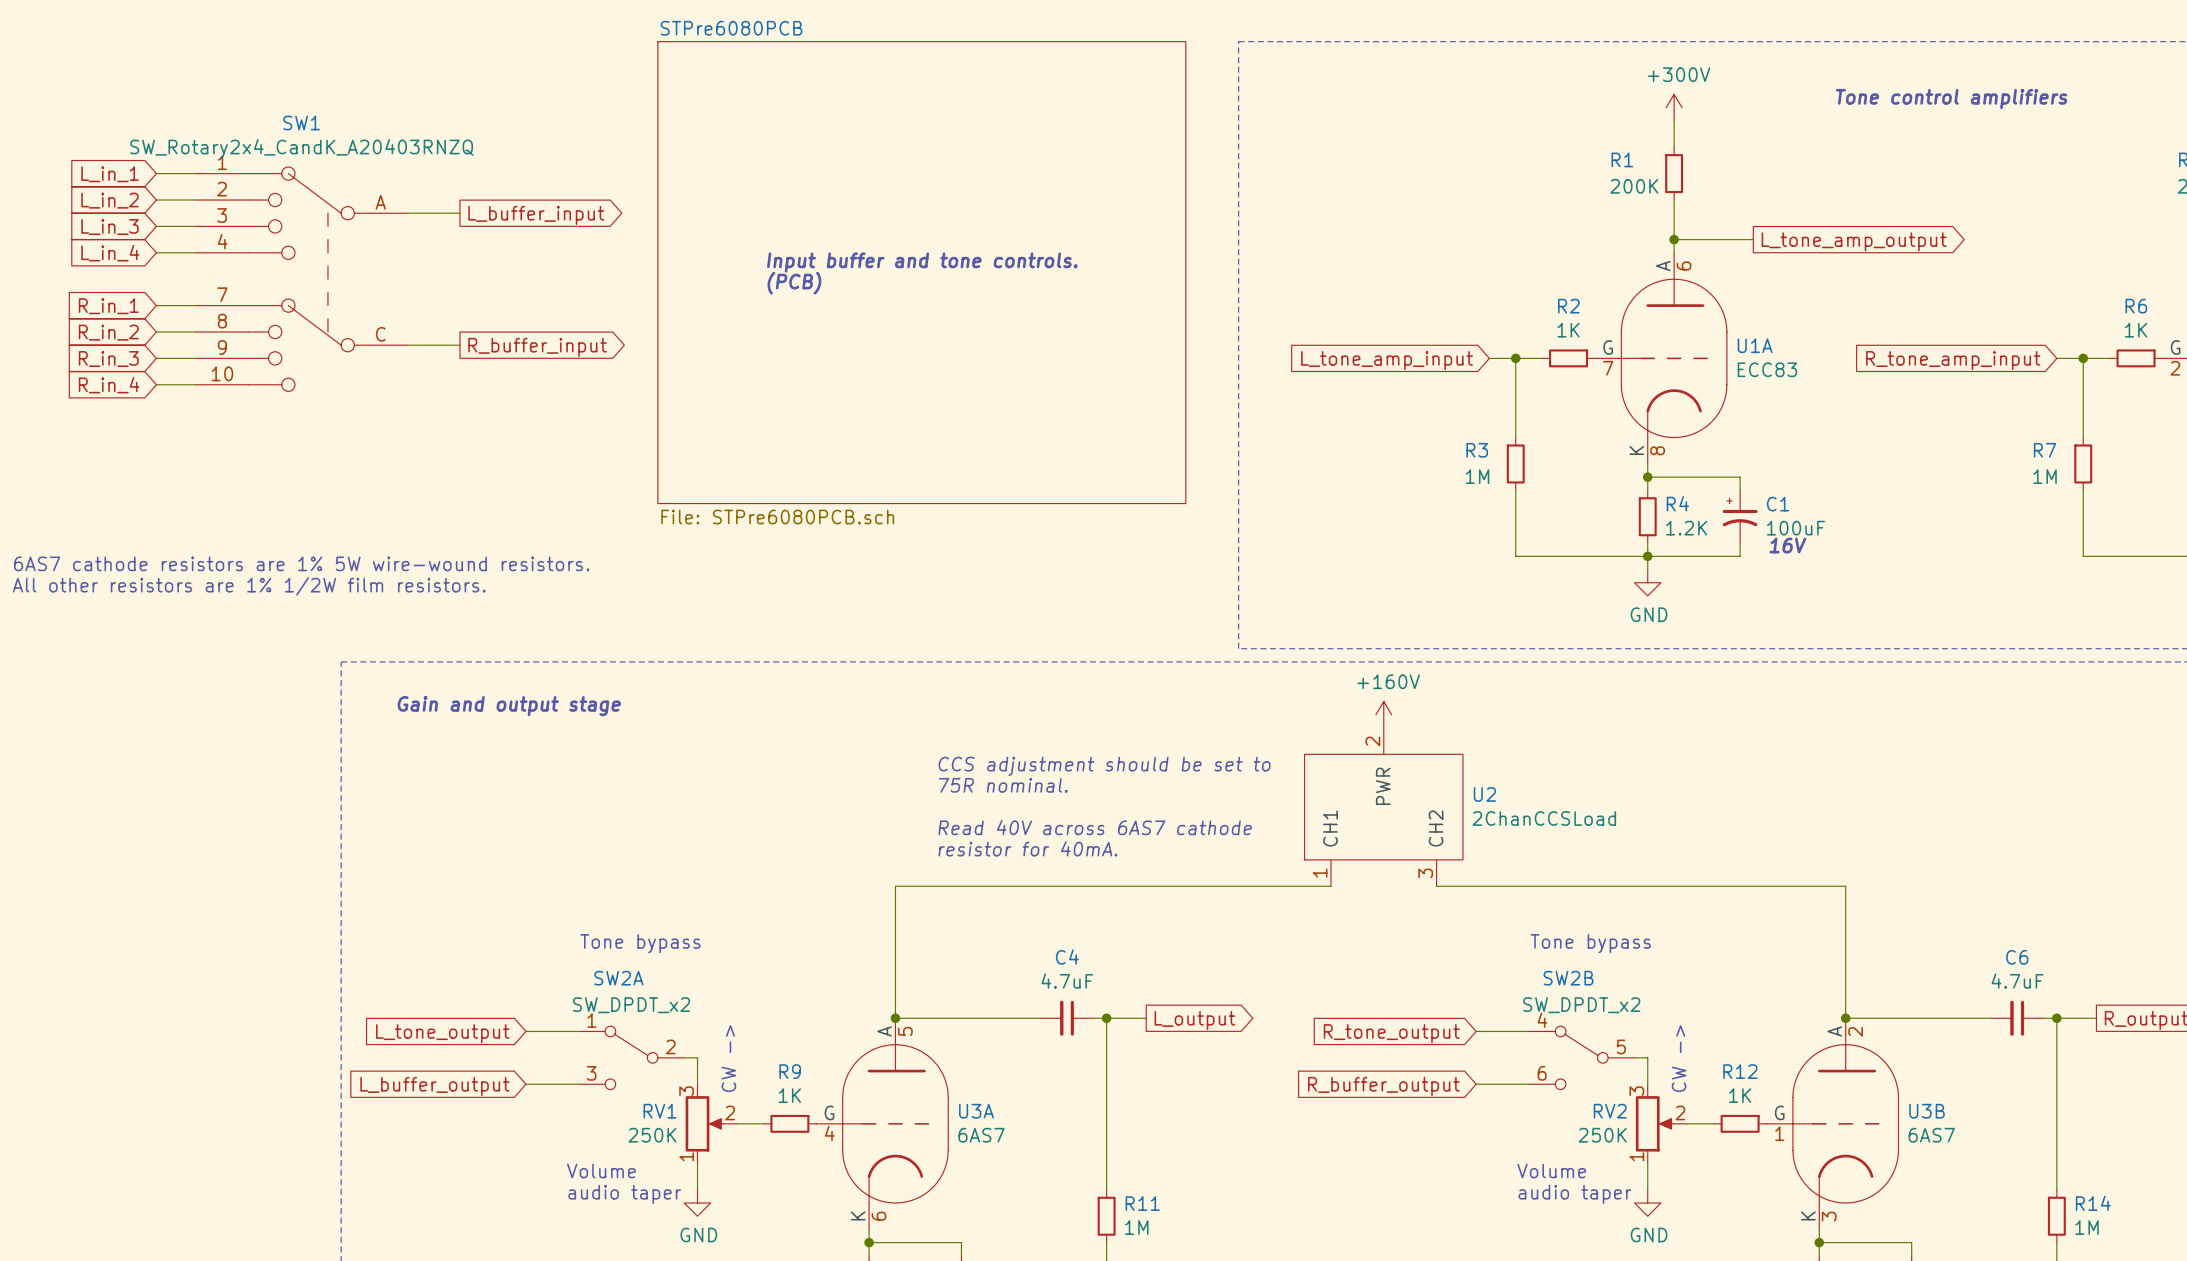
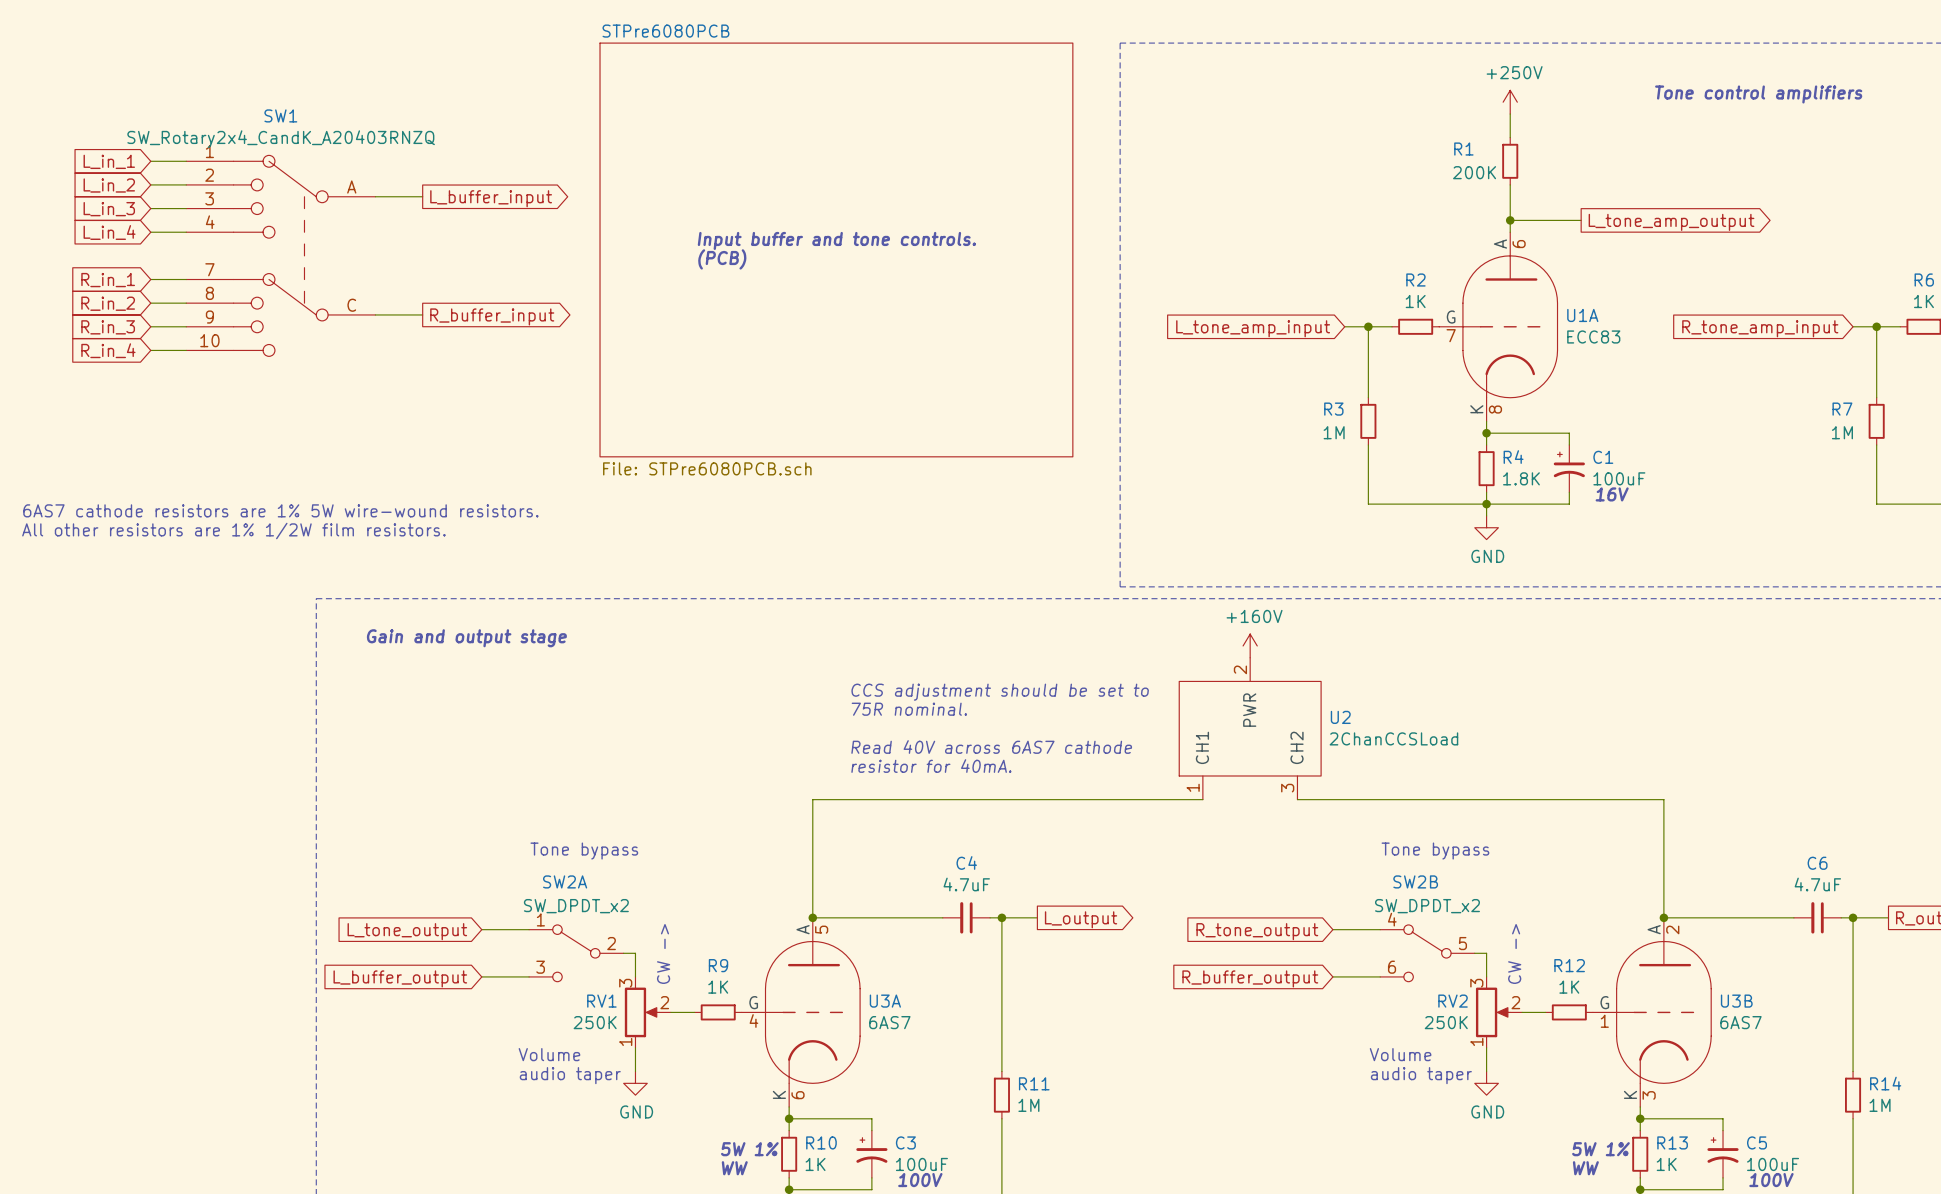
power symbol: +300V (1674, 107) -> +250V (1510, 102)
R4 value: 1.2K (1686, 528) -> 1.8K (1521, 478)

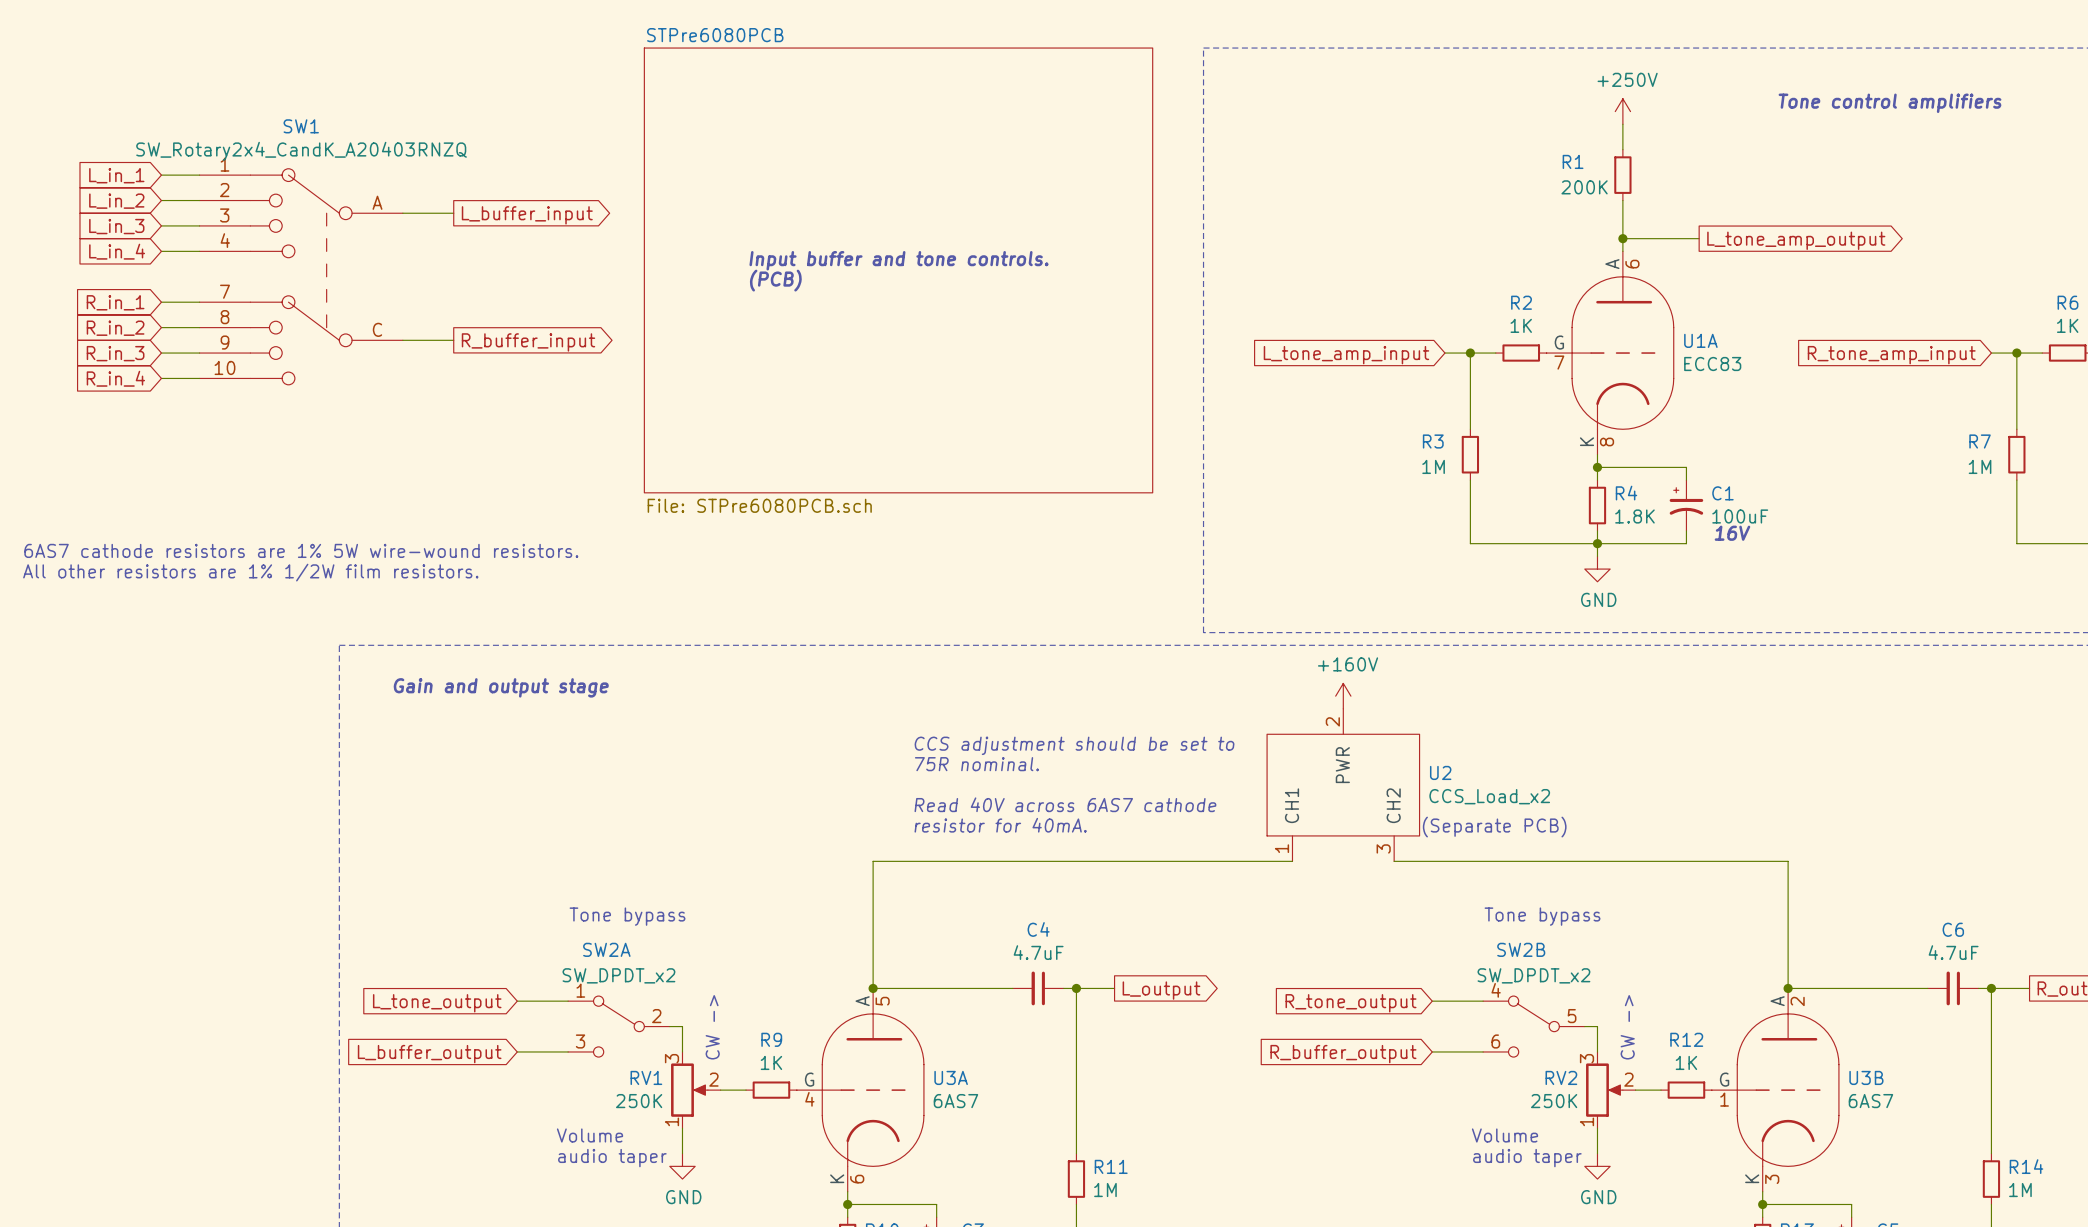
U2 value: 2ChanCCSLoad (1393, 738) -> CCS_Load_x2 (1489, 796)
text: none -> (Separate PCB) (1494, 827)

